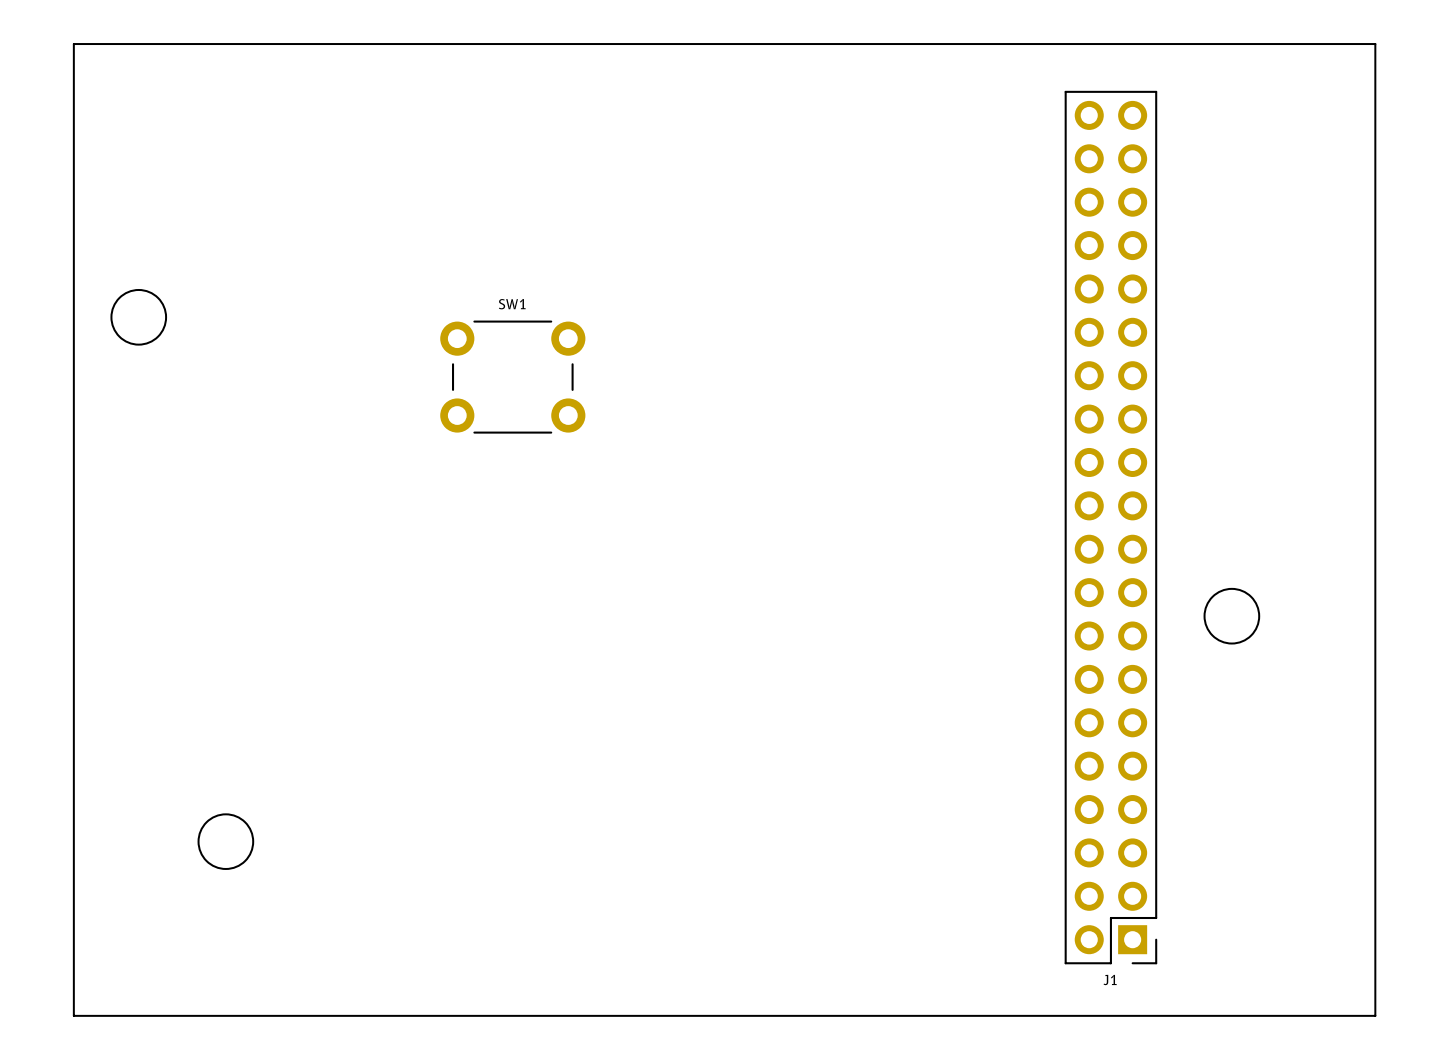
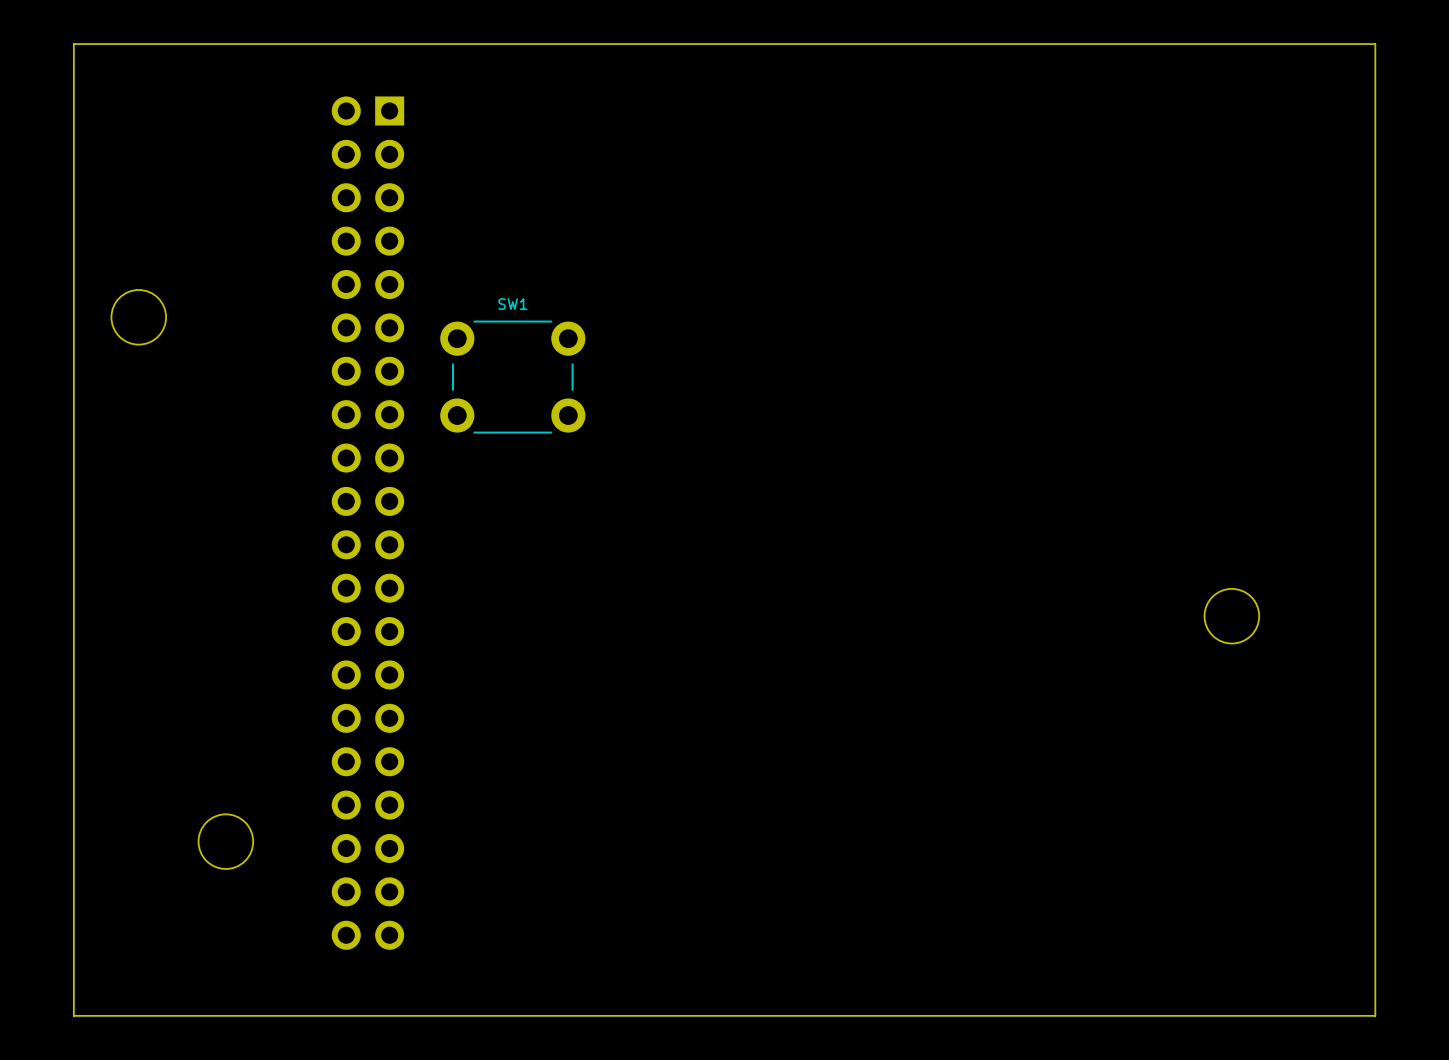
part: none -> (367, 523)
J1: (1110, 527) -> none

